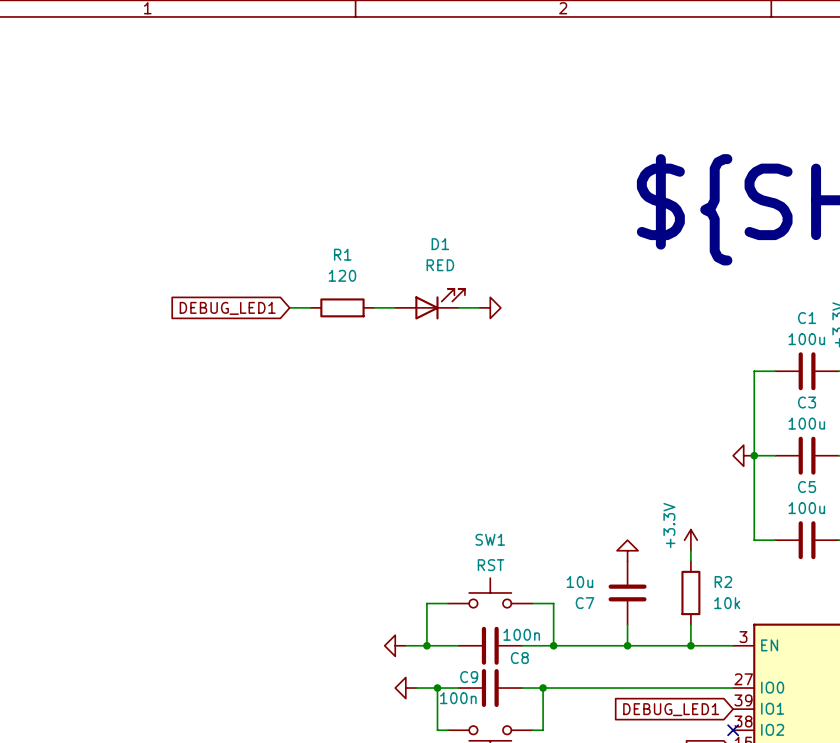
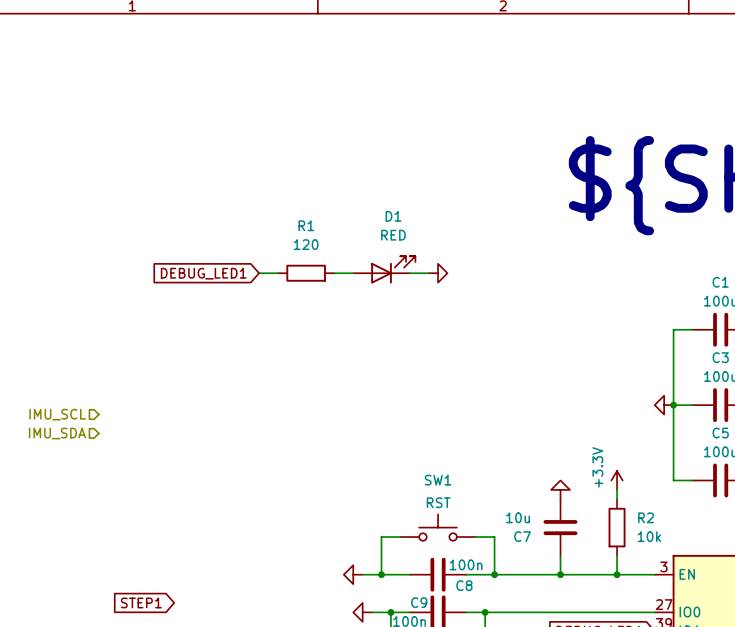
hierarchical label: none -> IMU_SCL (57, 414)
hierarchical label: none -> IMU_SDA (57, 433)
global label: none -> STEP1 (141, 602)

